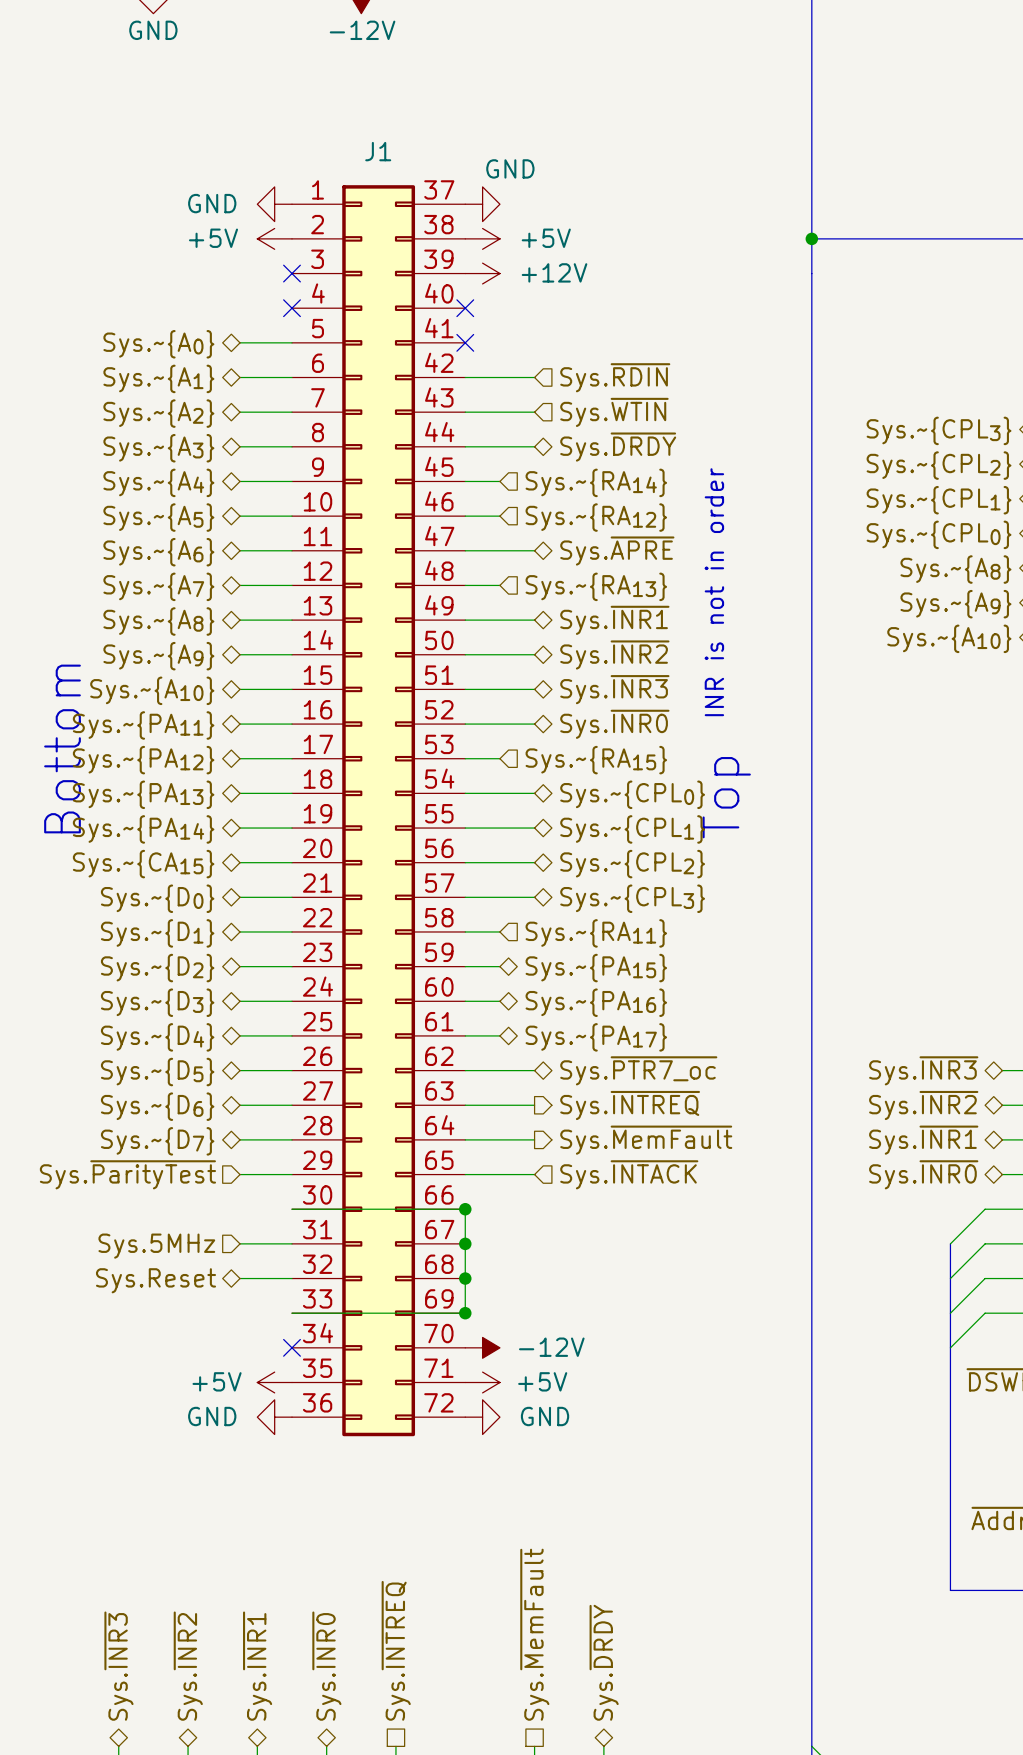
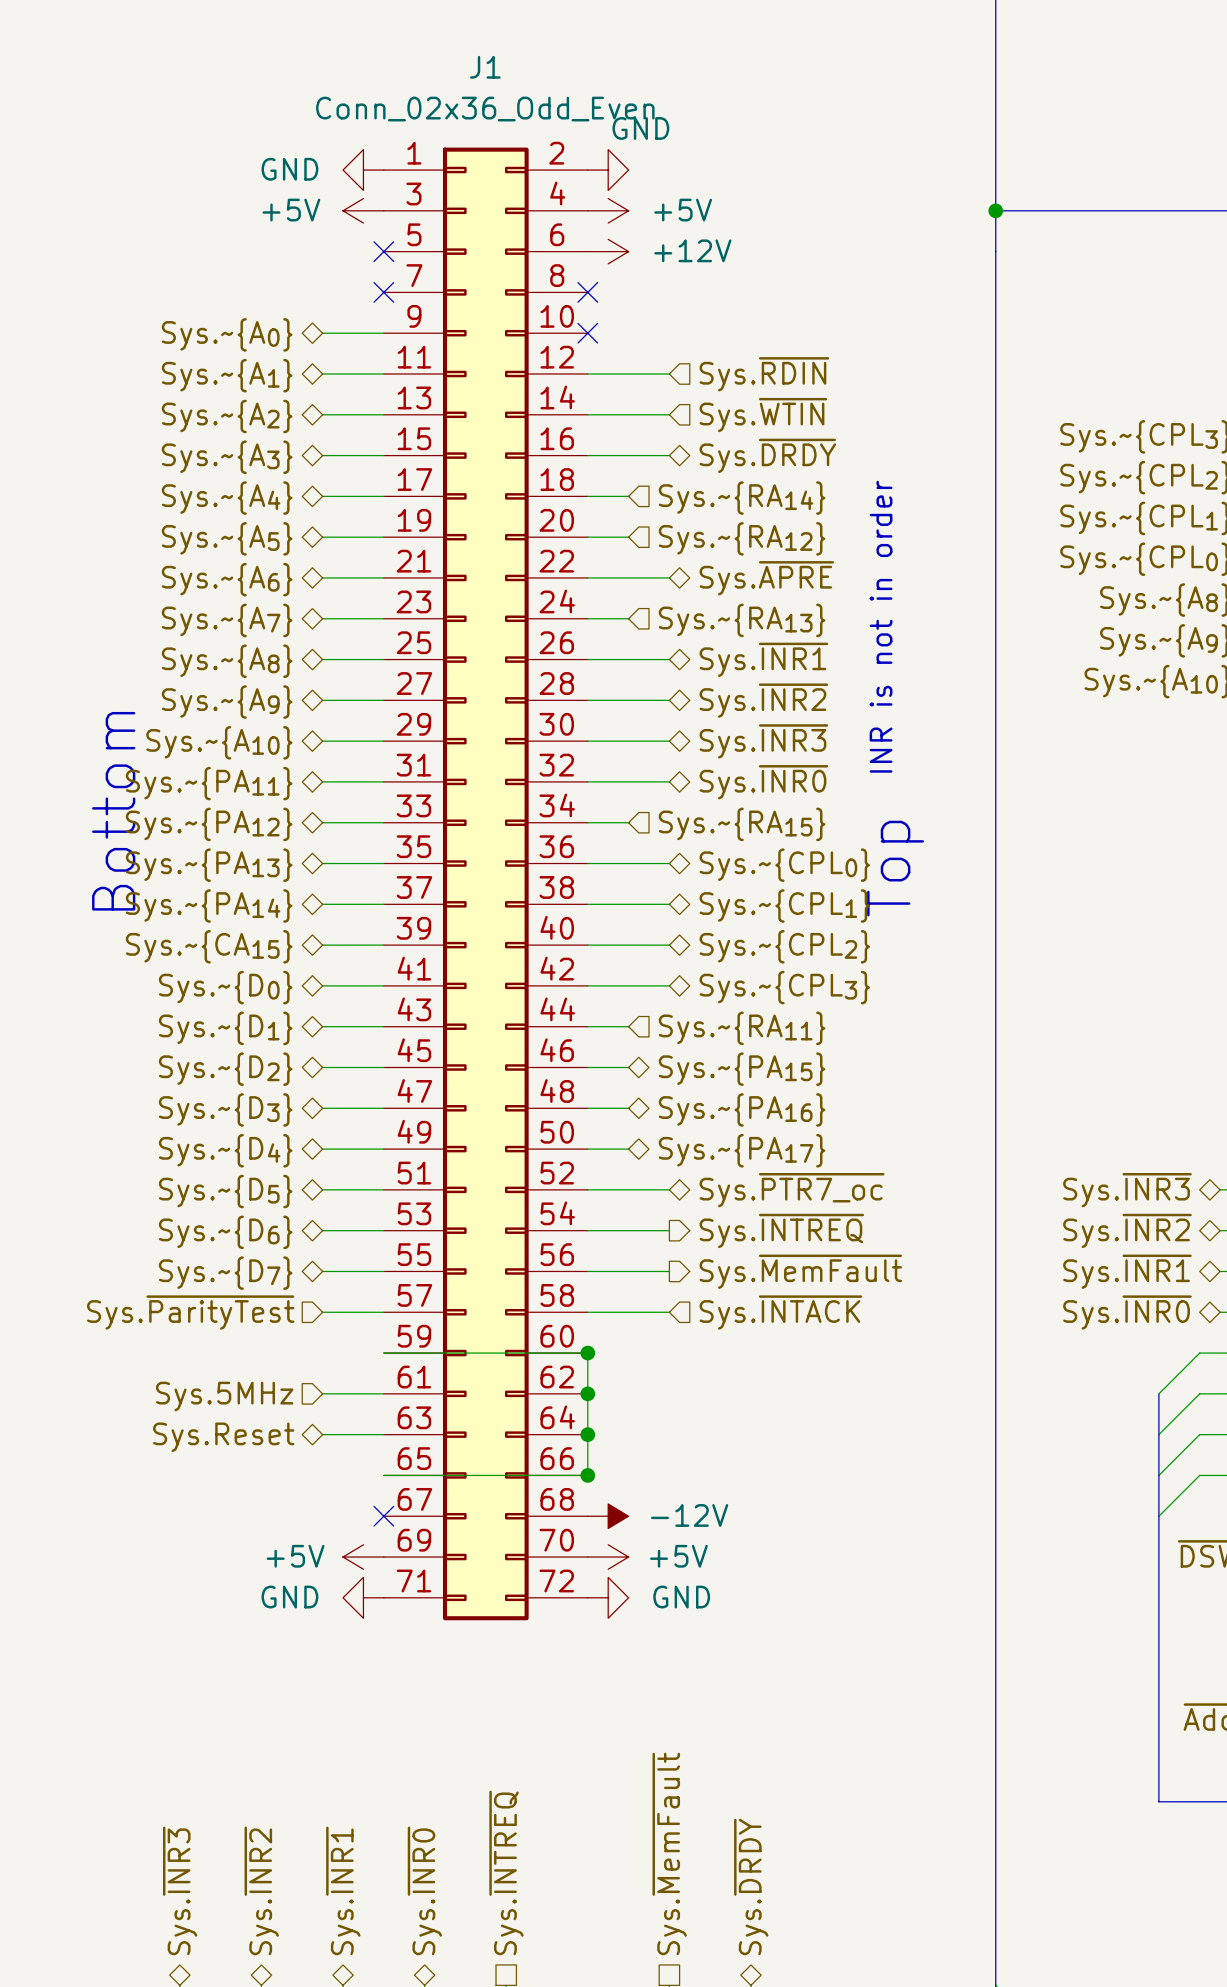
J1 name position: J1 (378, 151) -> J1 (485, 67)
J1 value: none -> Conn_02x36_Odd_Even (485, 109)
J1 symbol: [292, 185, 466, 1437] -> [383, 147, 588, 1621]

